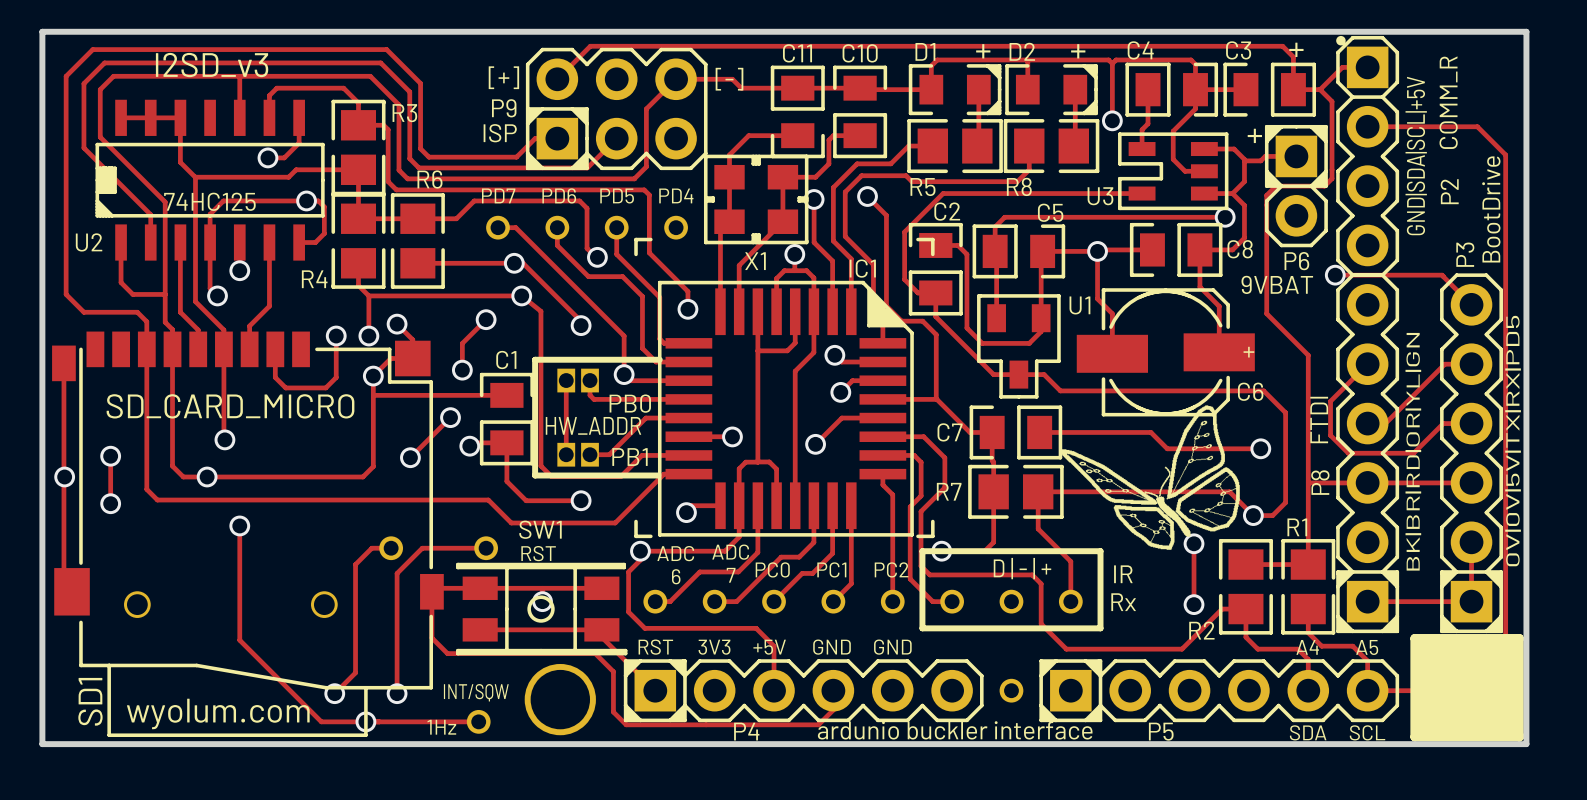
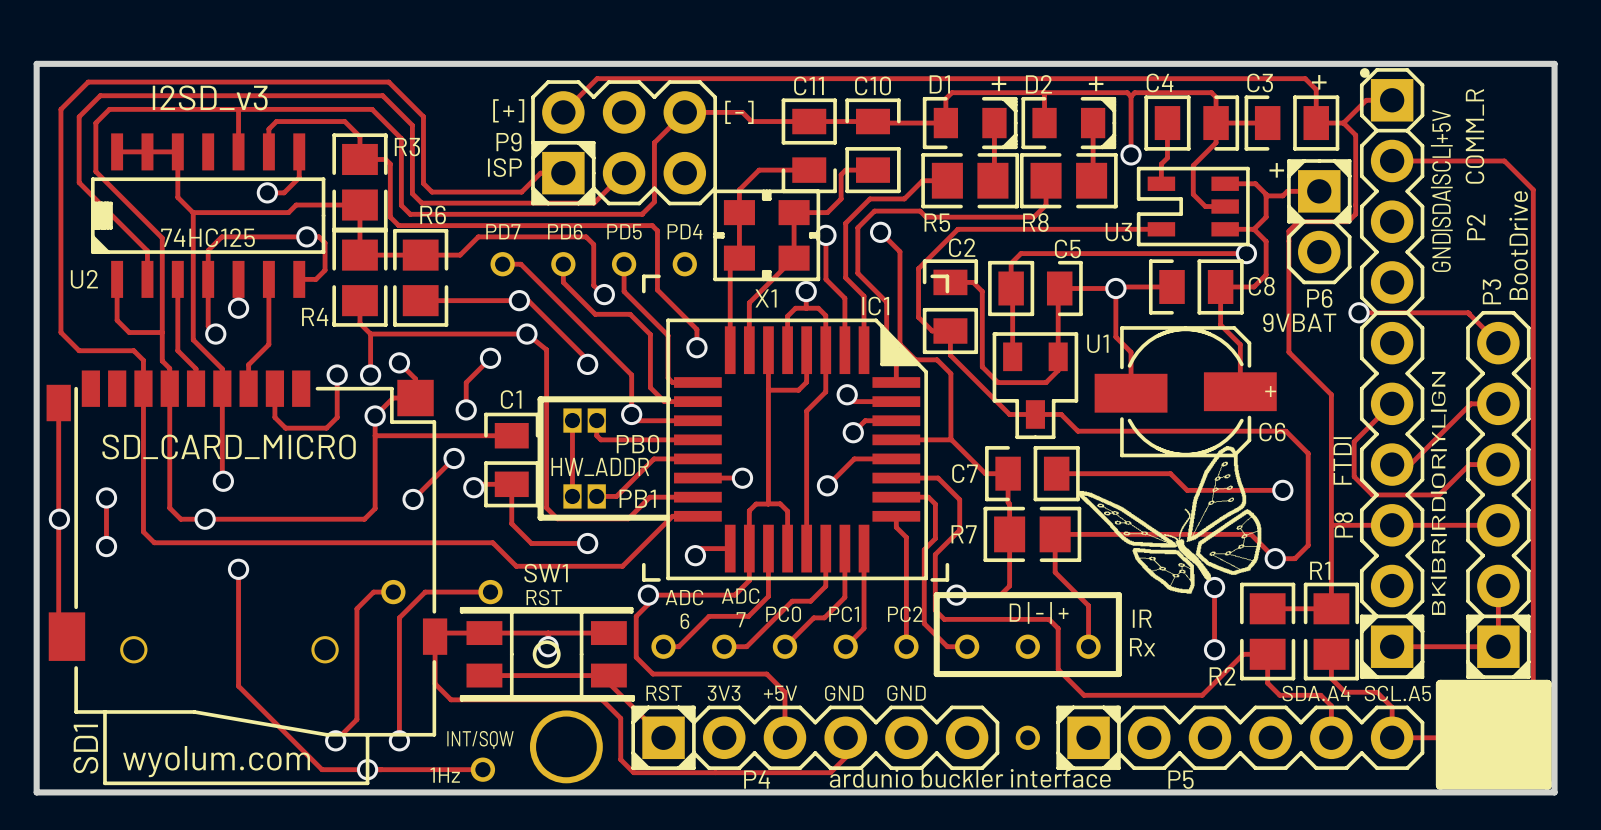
text: 0V|0V|5V|TX|RX|PD5 (1513, 441) -> none
text: A4 (1307, 647) -> SDA.A4 (1316, 693)
text: A5 (1367, 647) -> SCL.A5 (1397, 693)
text: SDA (1308, 732) -> none
text: SCL (1367, 732) -> none

